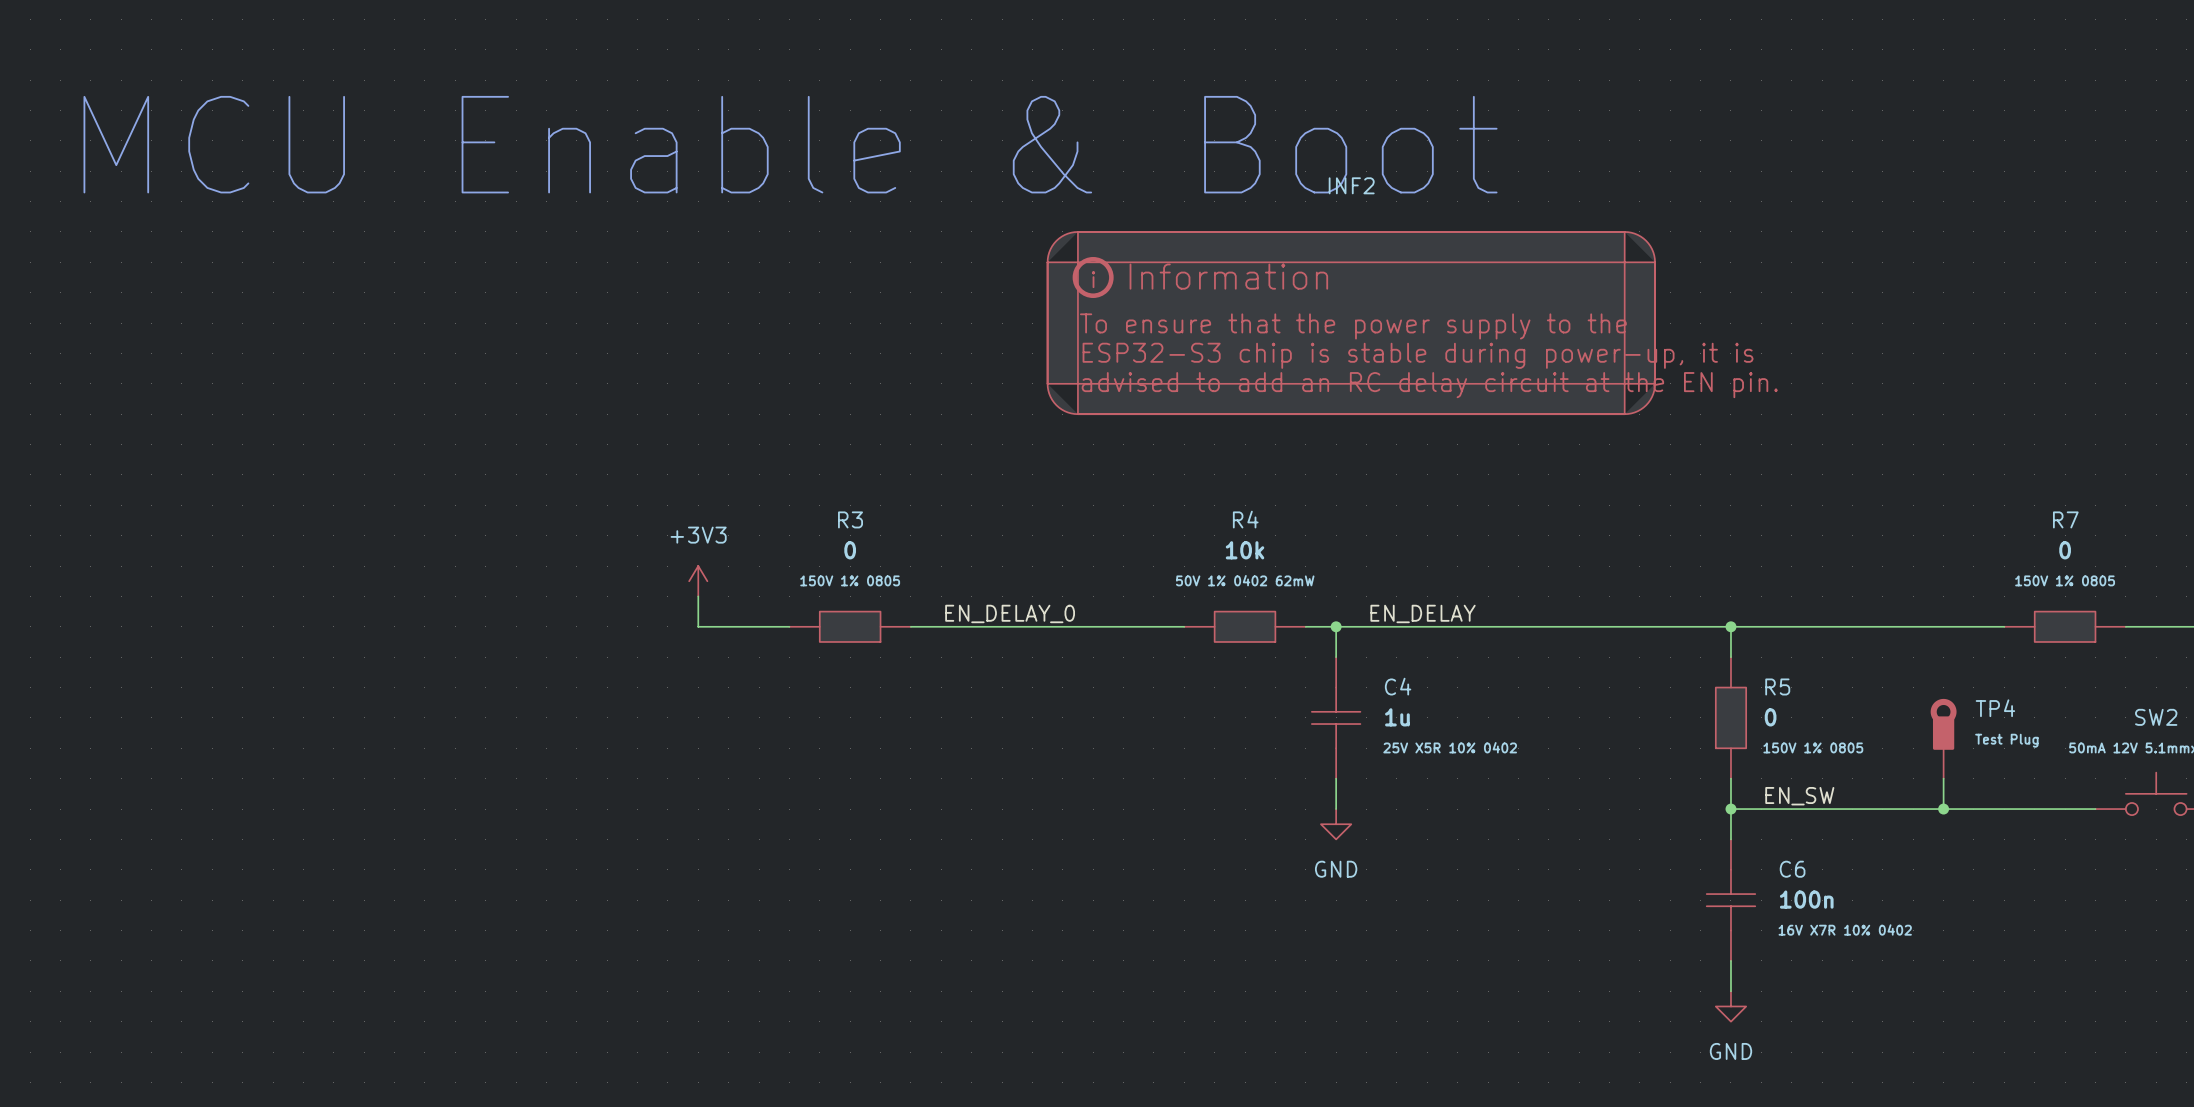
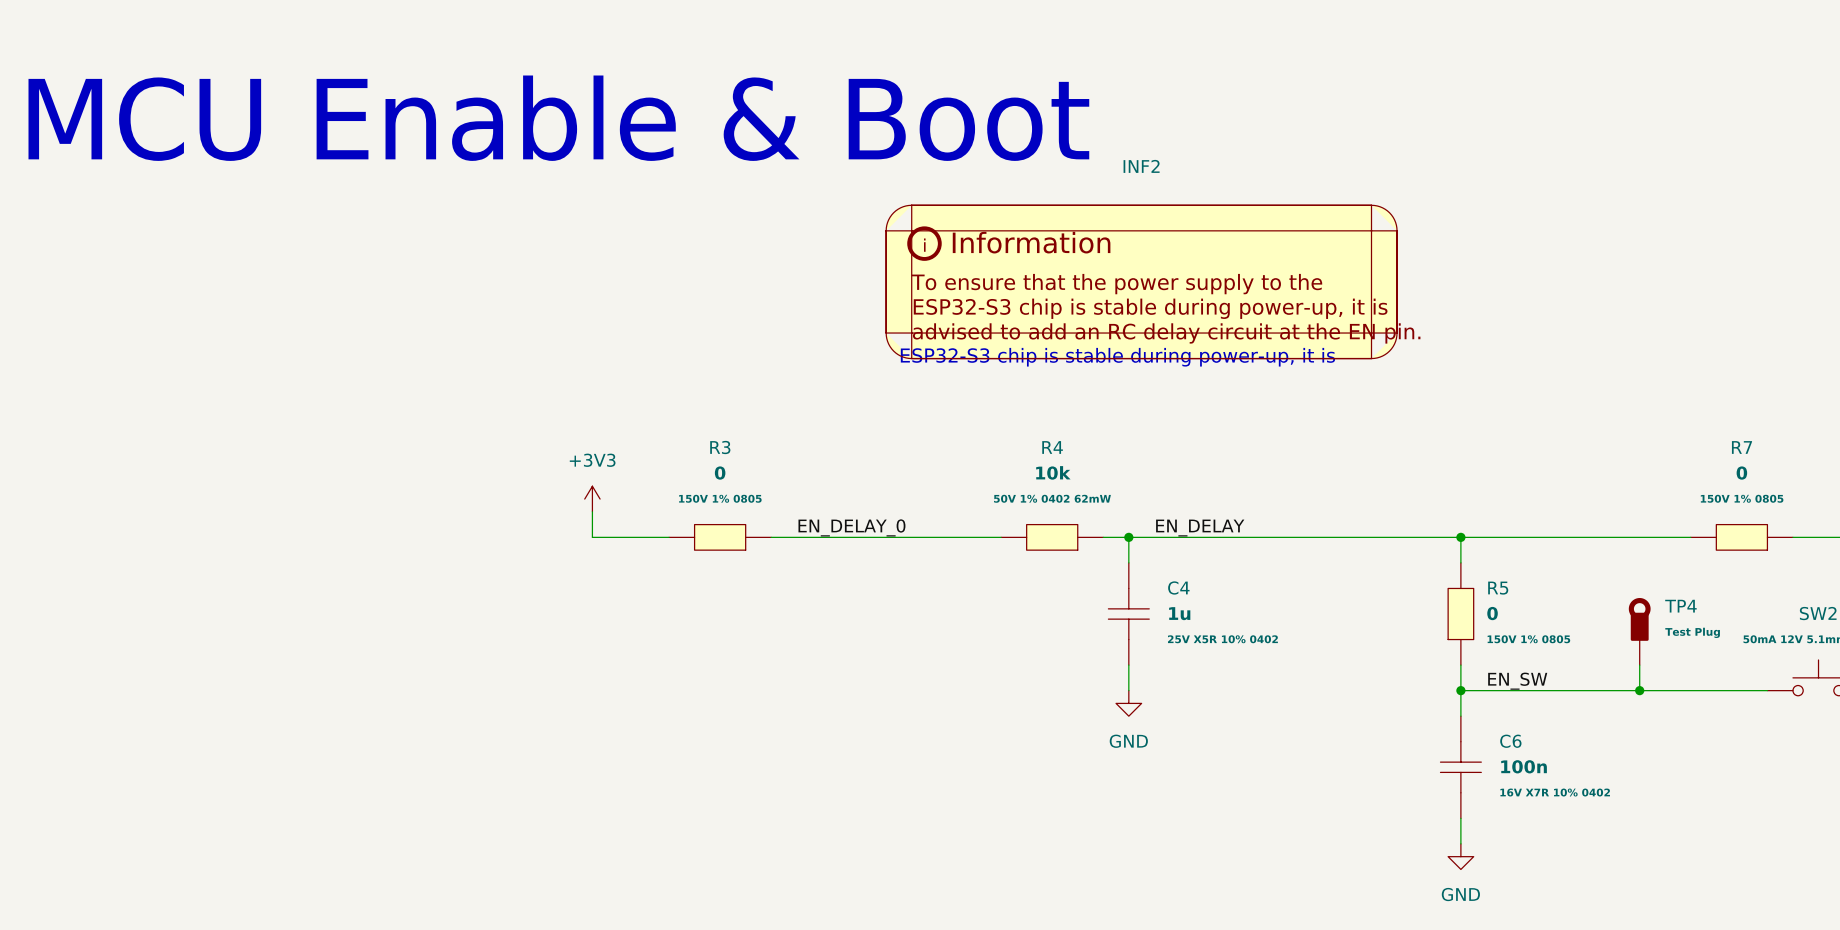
text position: MCU Enable & Boot (790, 144) -> MCU Enable & Boot (558, 118)
text: none -> ESP32-S3 chip is stable during power-up, it is (1117, 357)

